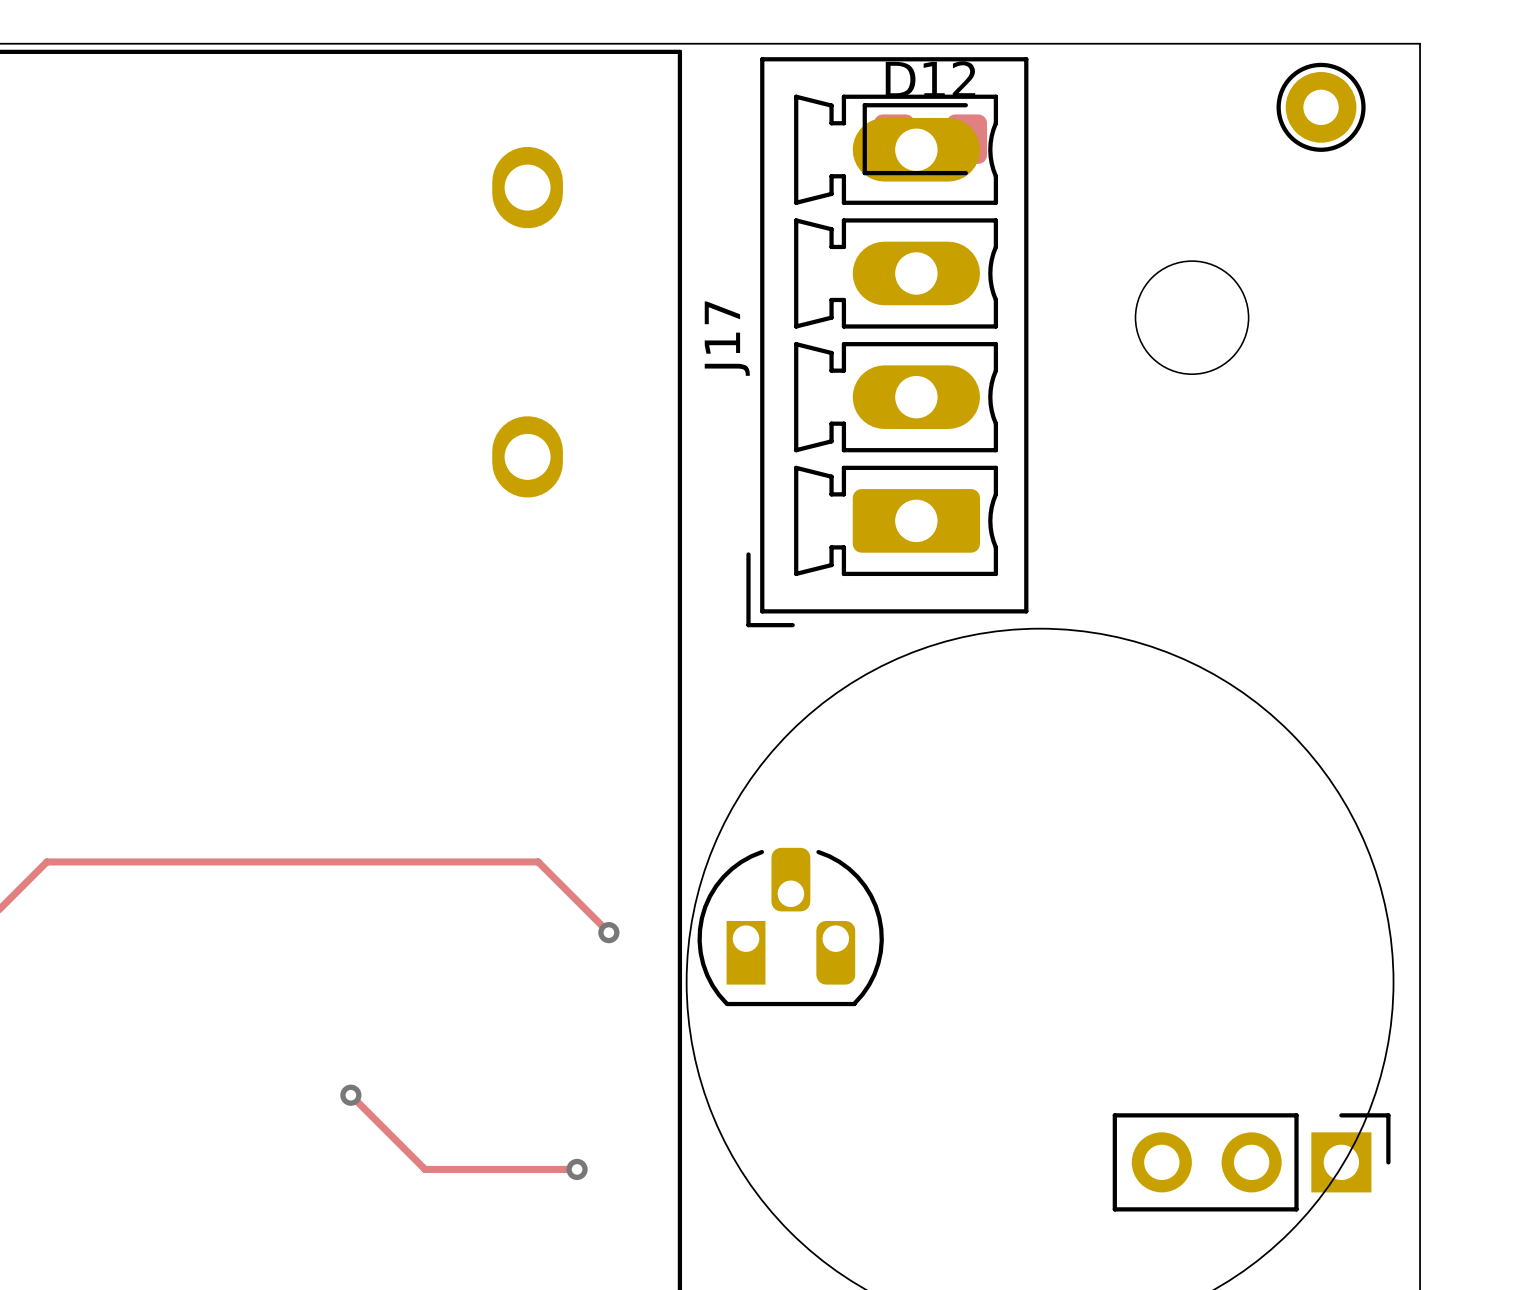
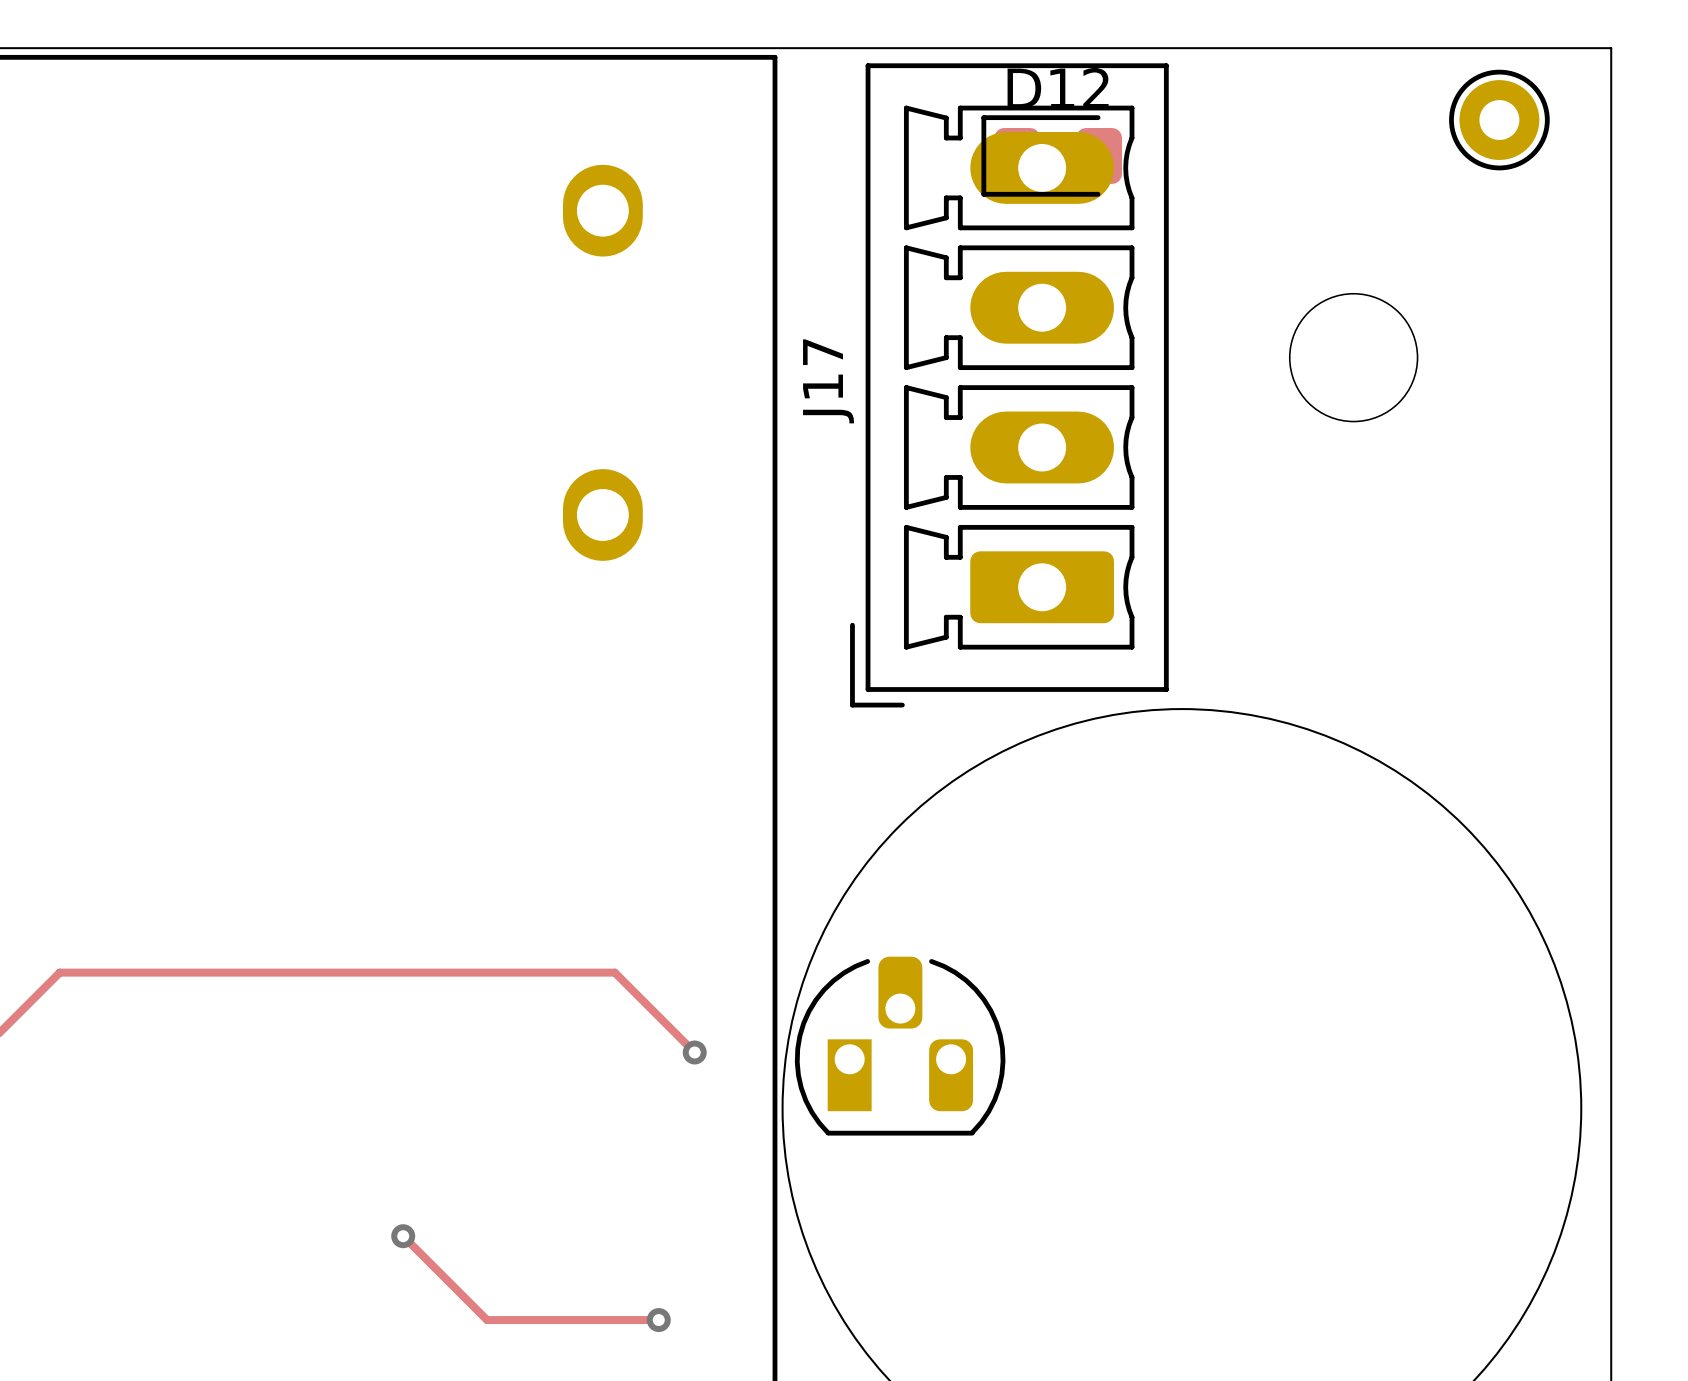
part: (1251, 1162) -> none

